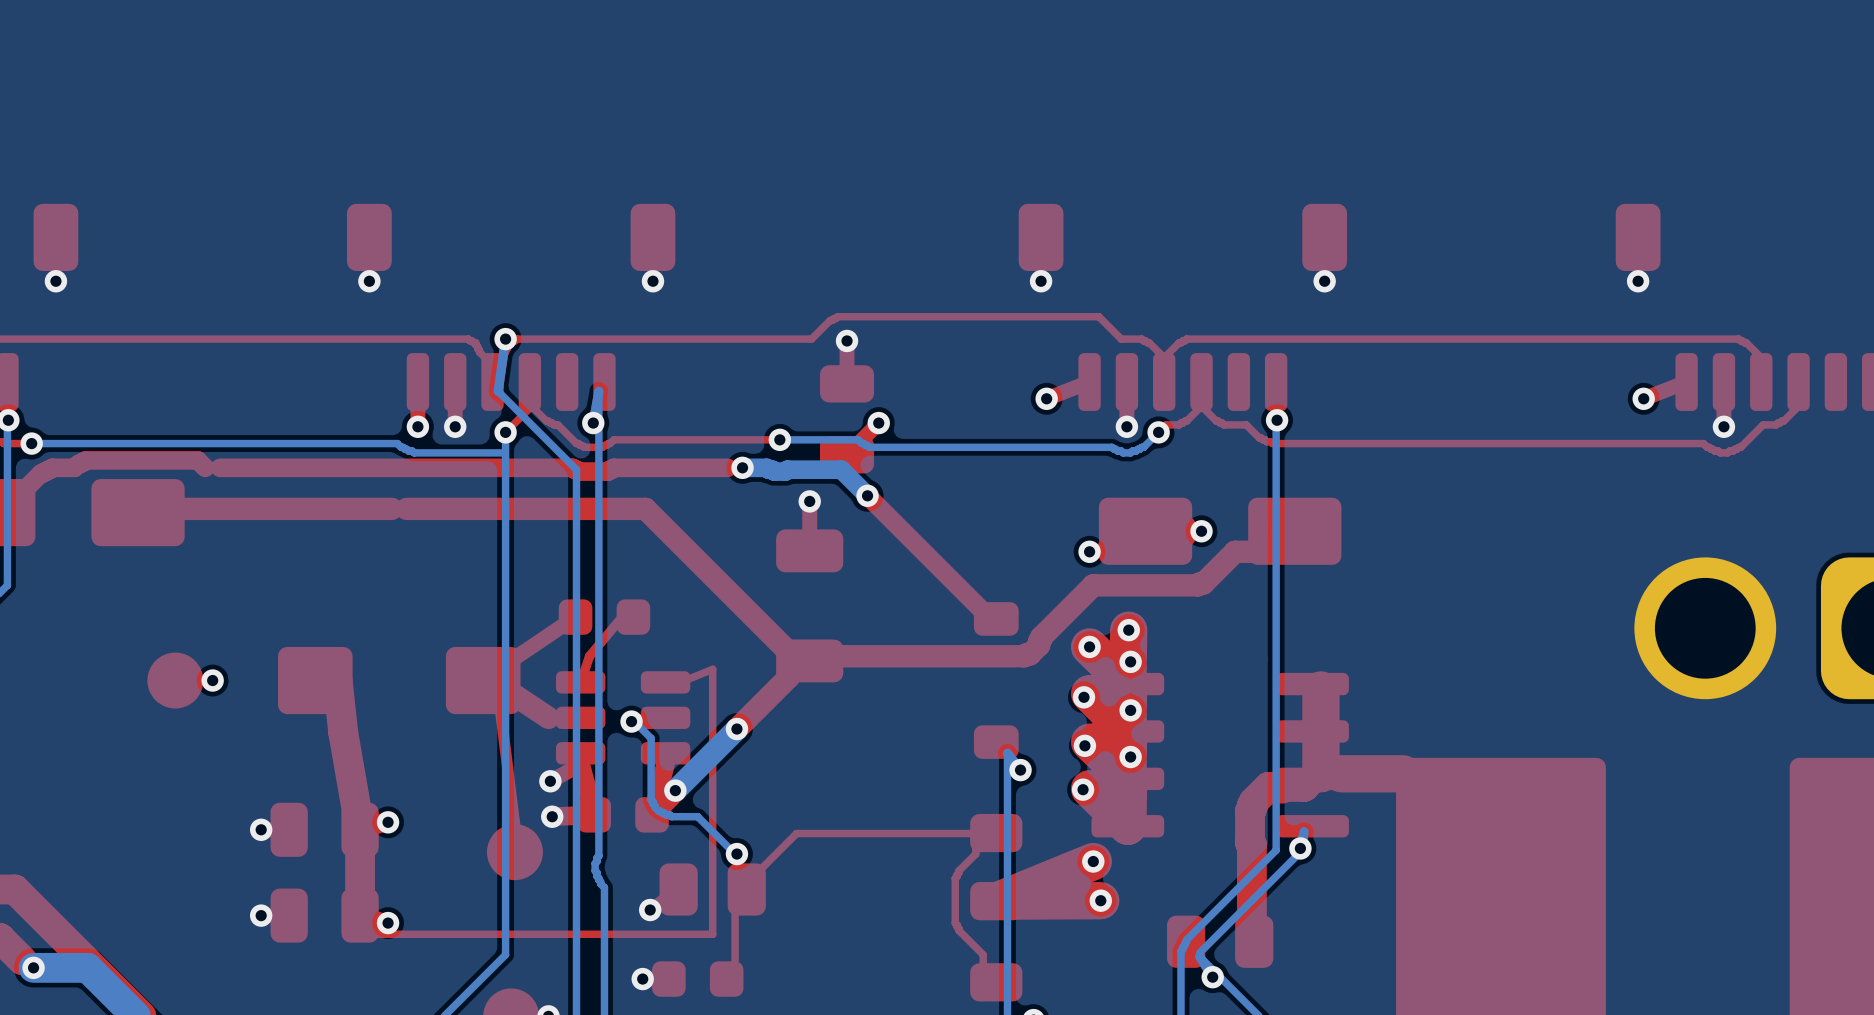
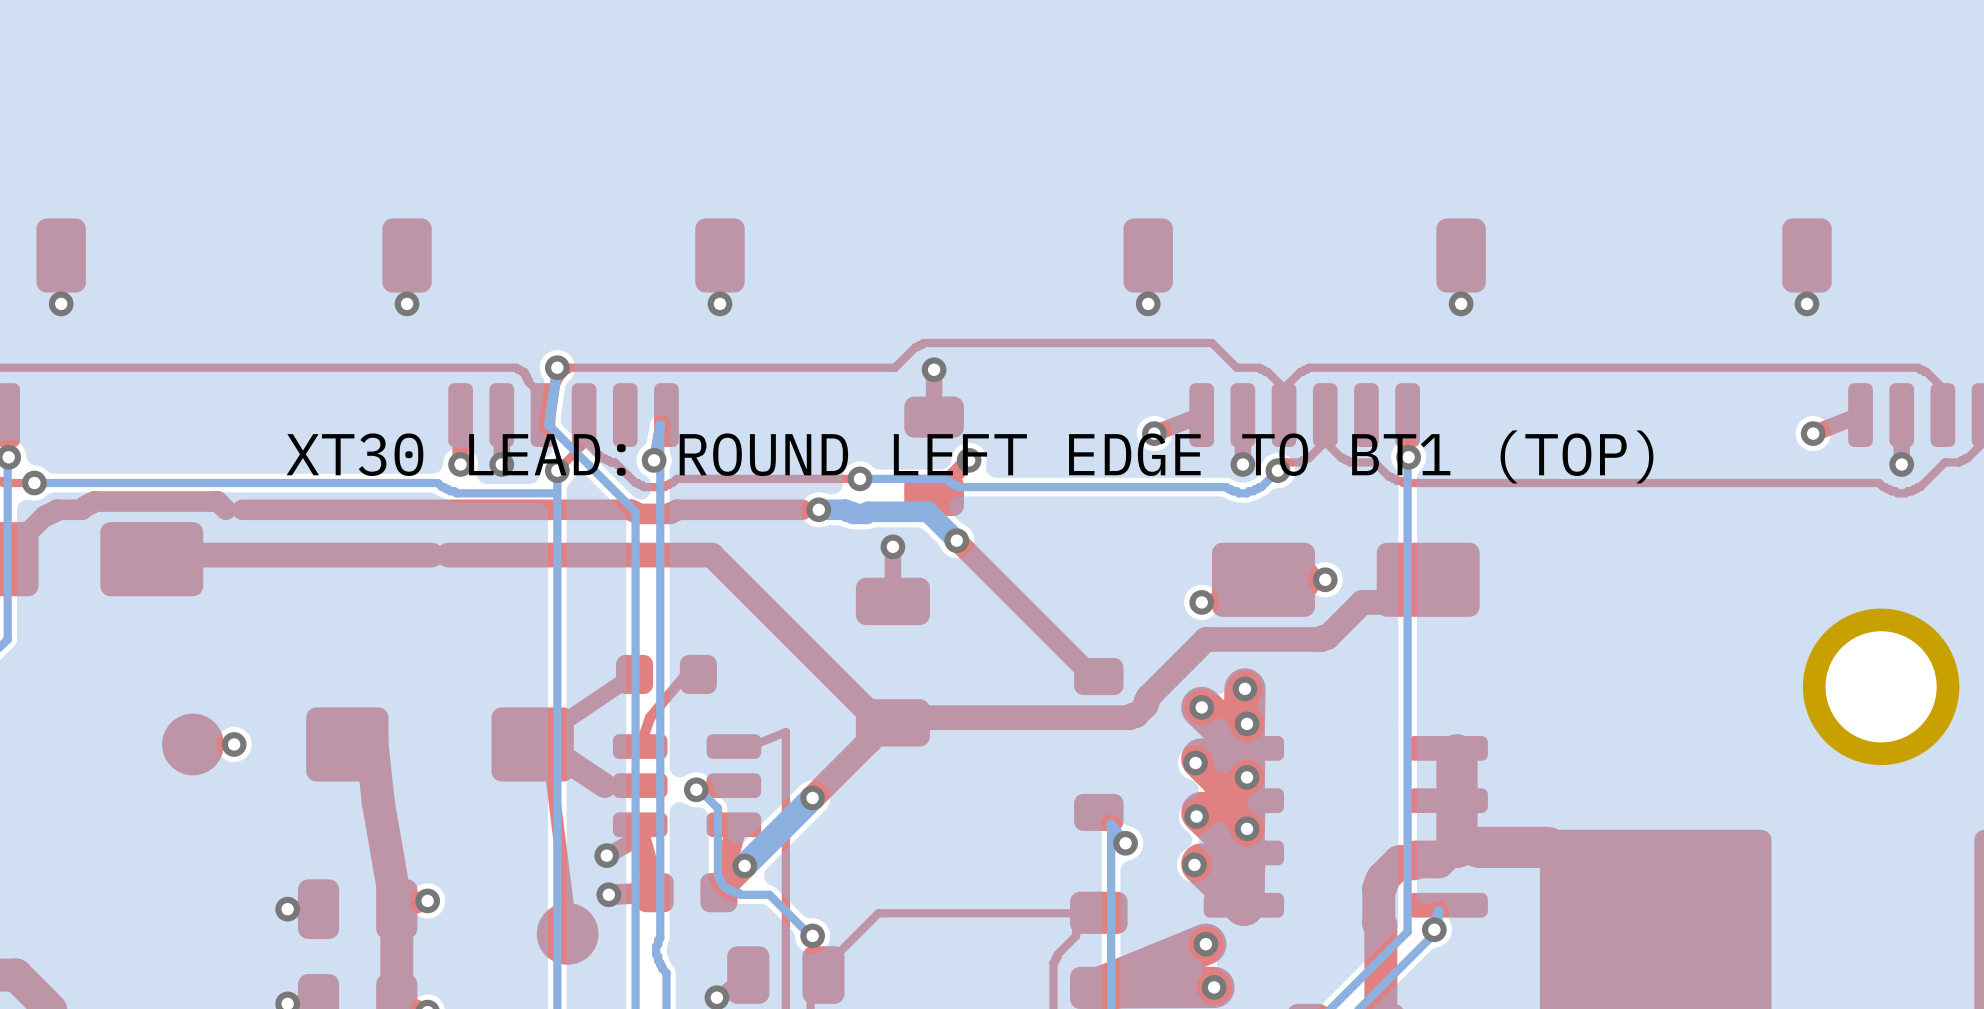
text: none -> XT30 LEAD: ROUND LEFT EDGE TO BT1 (TOP) (969, 456)

